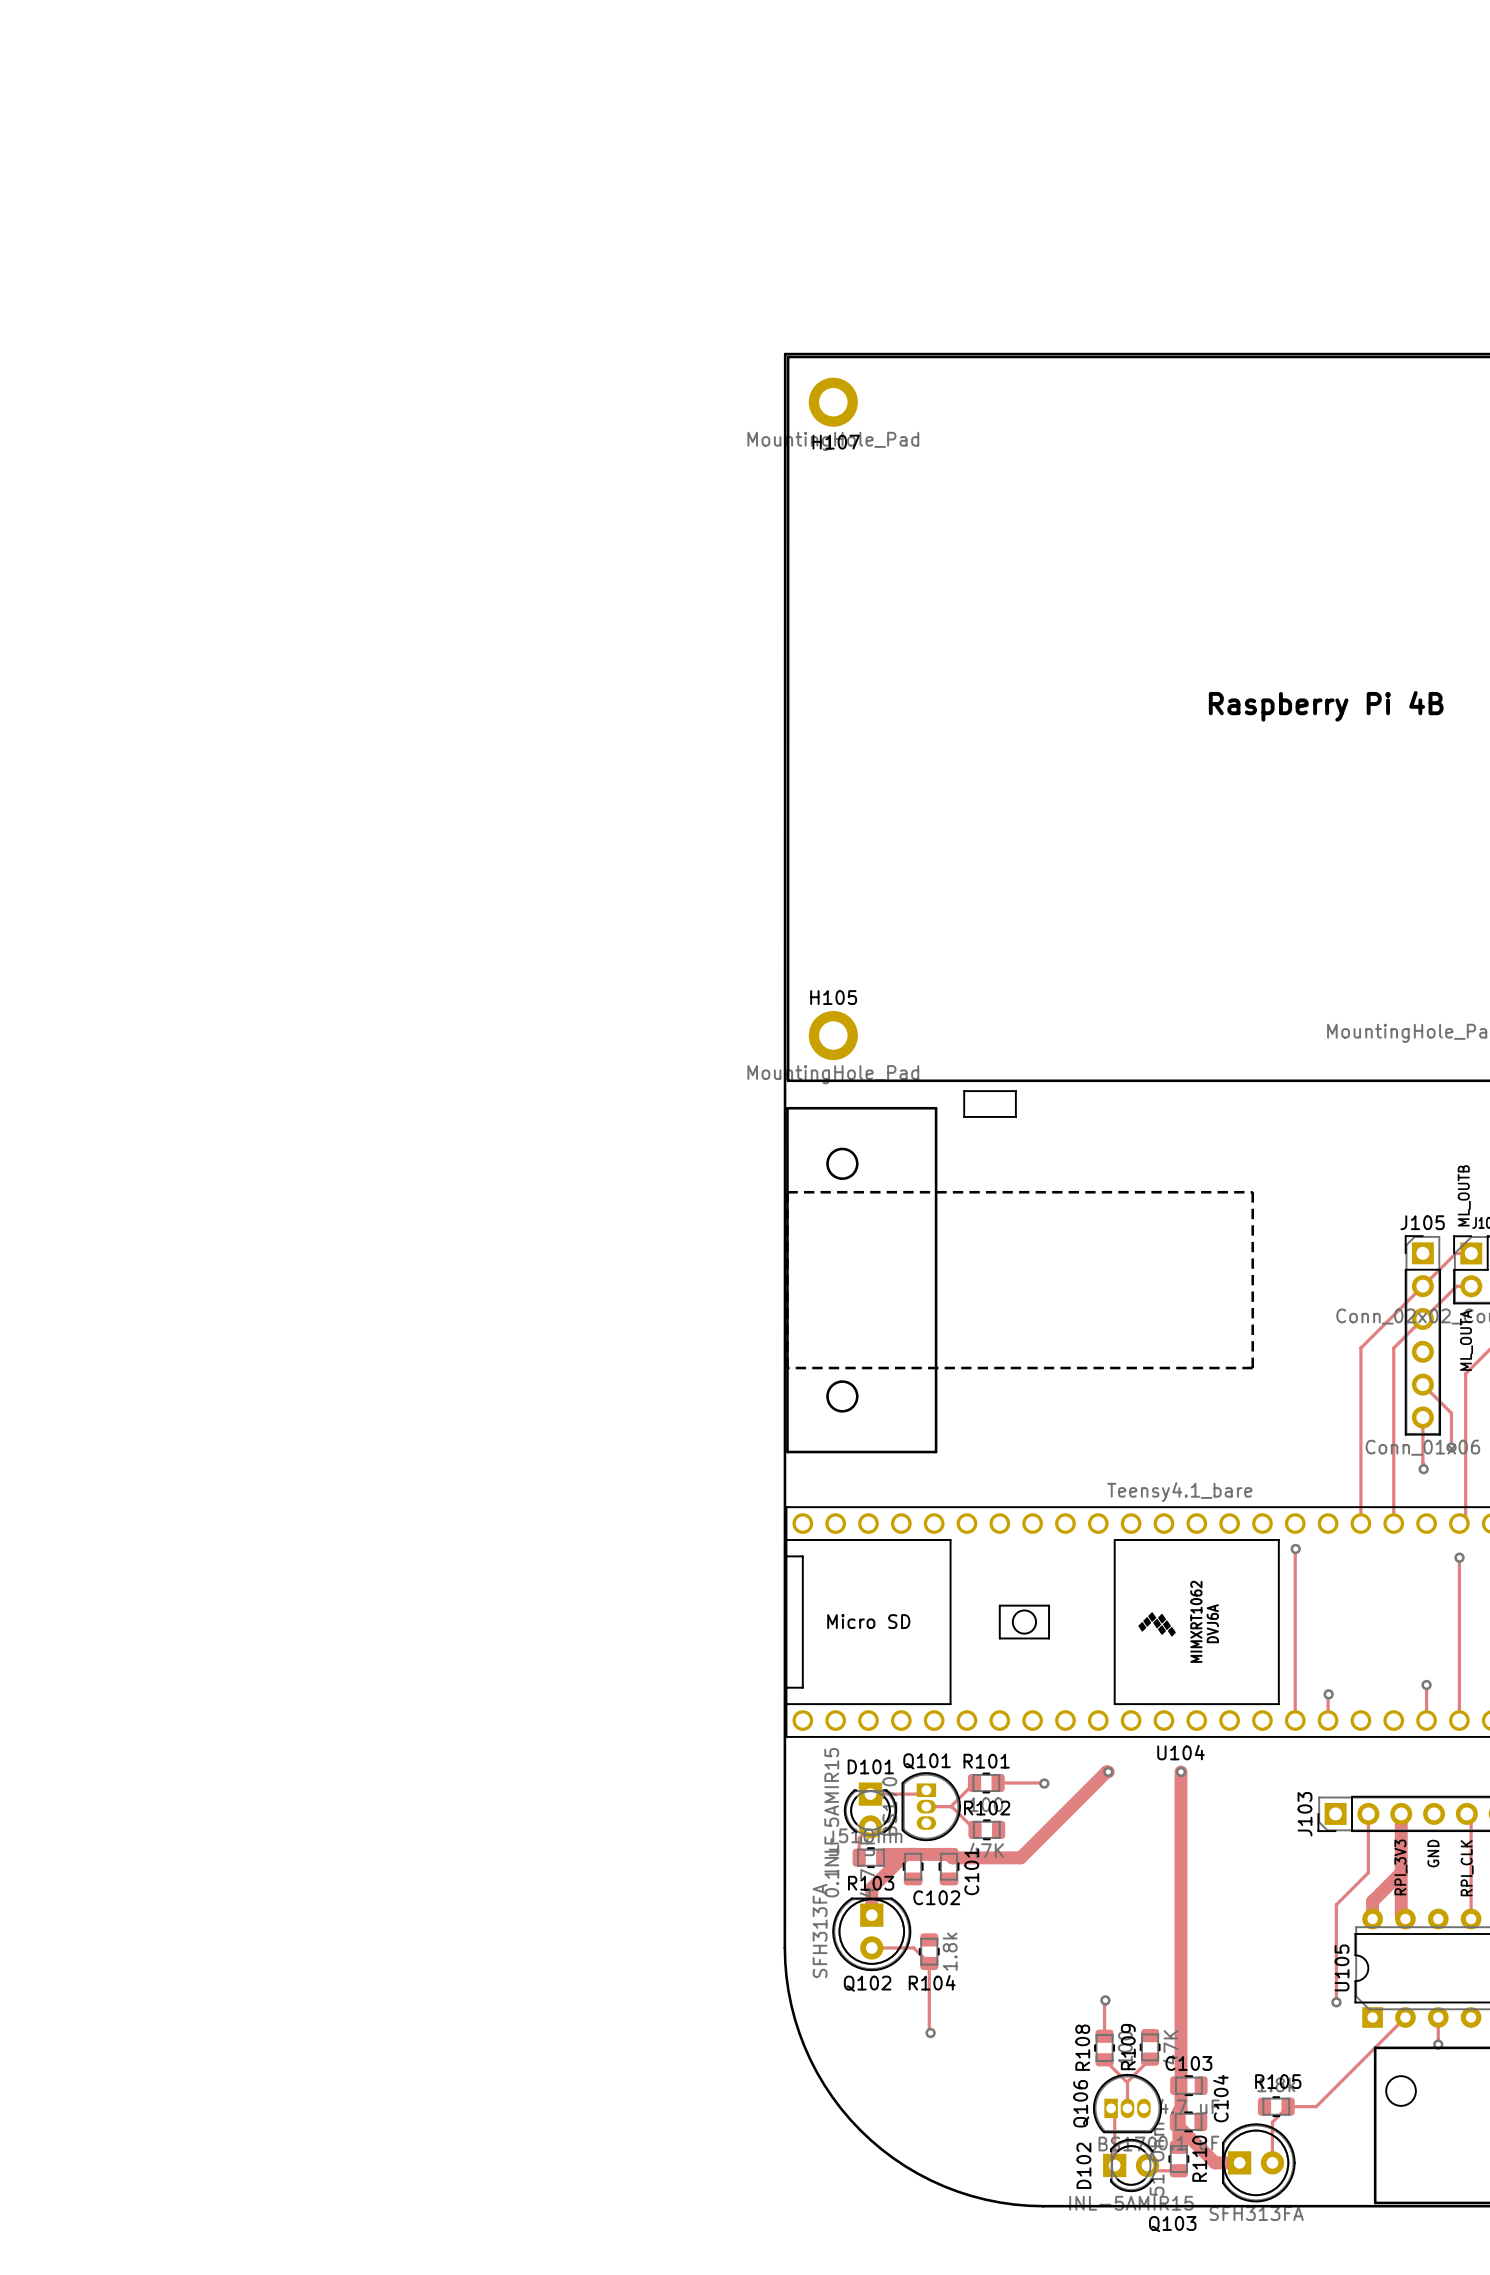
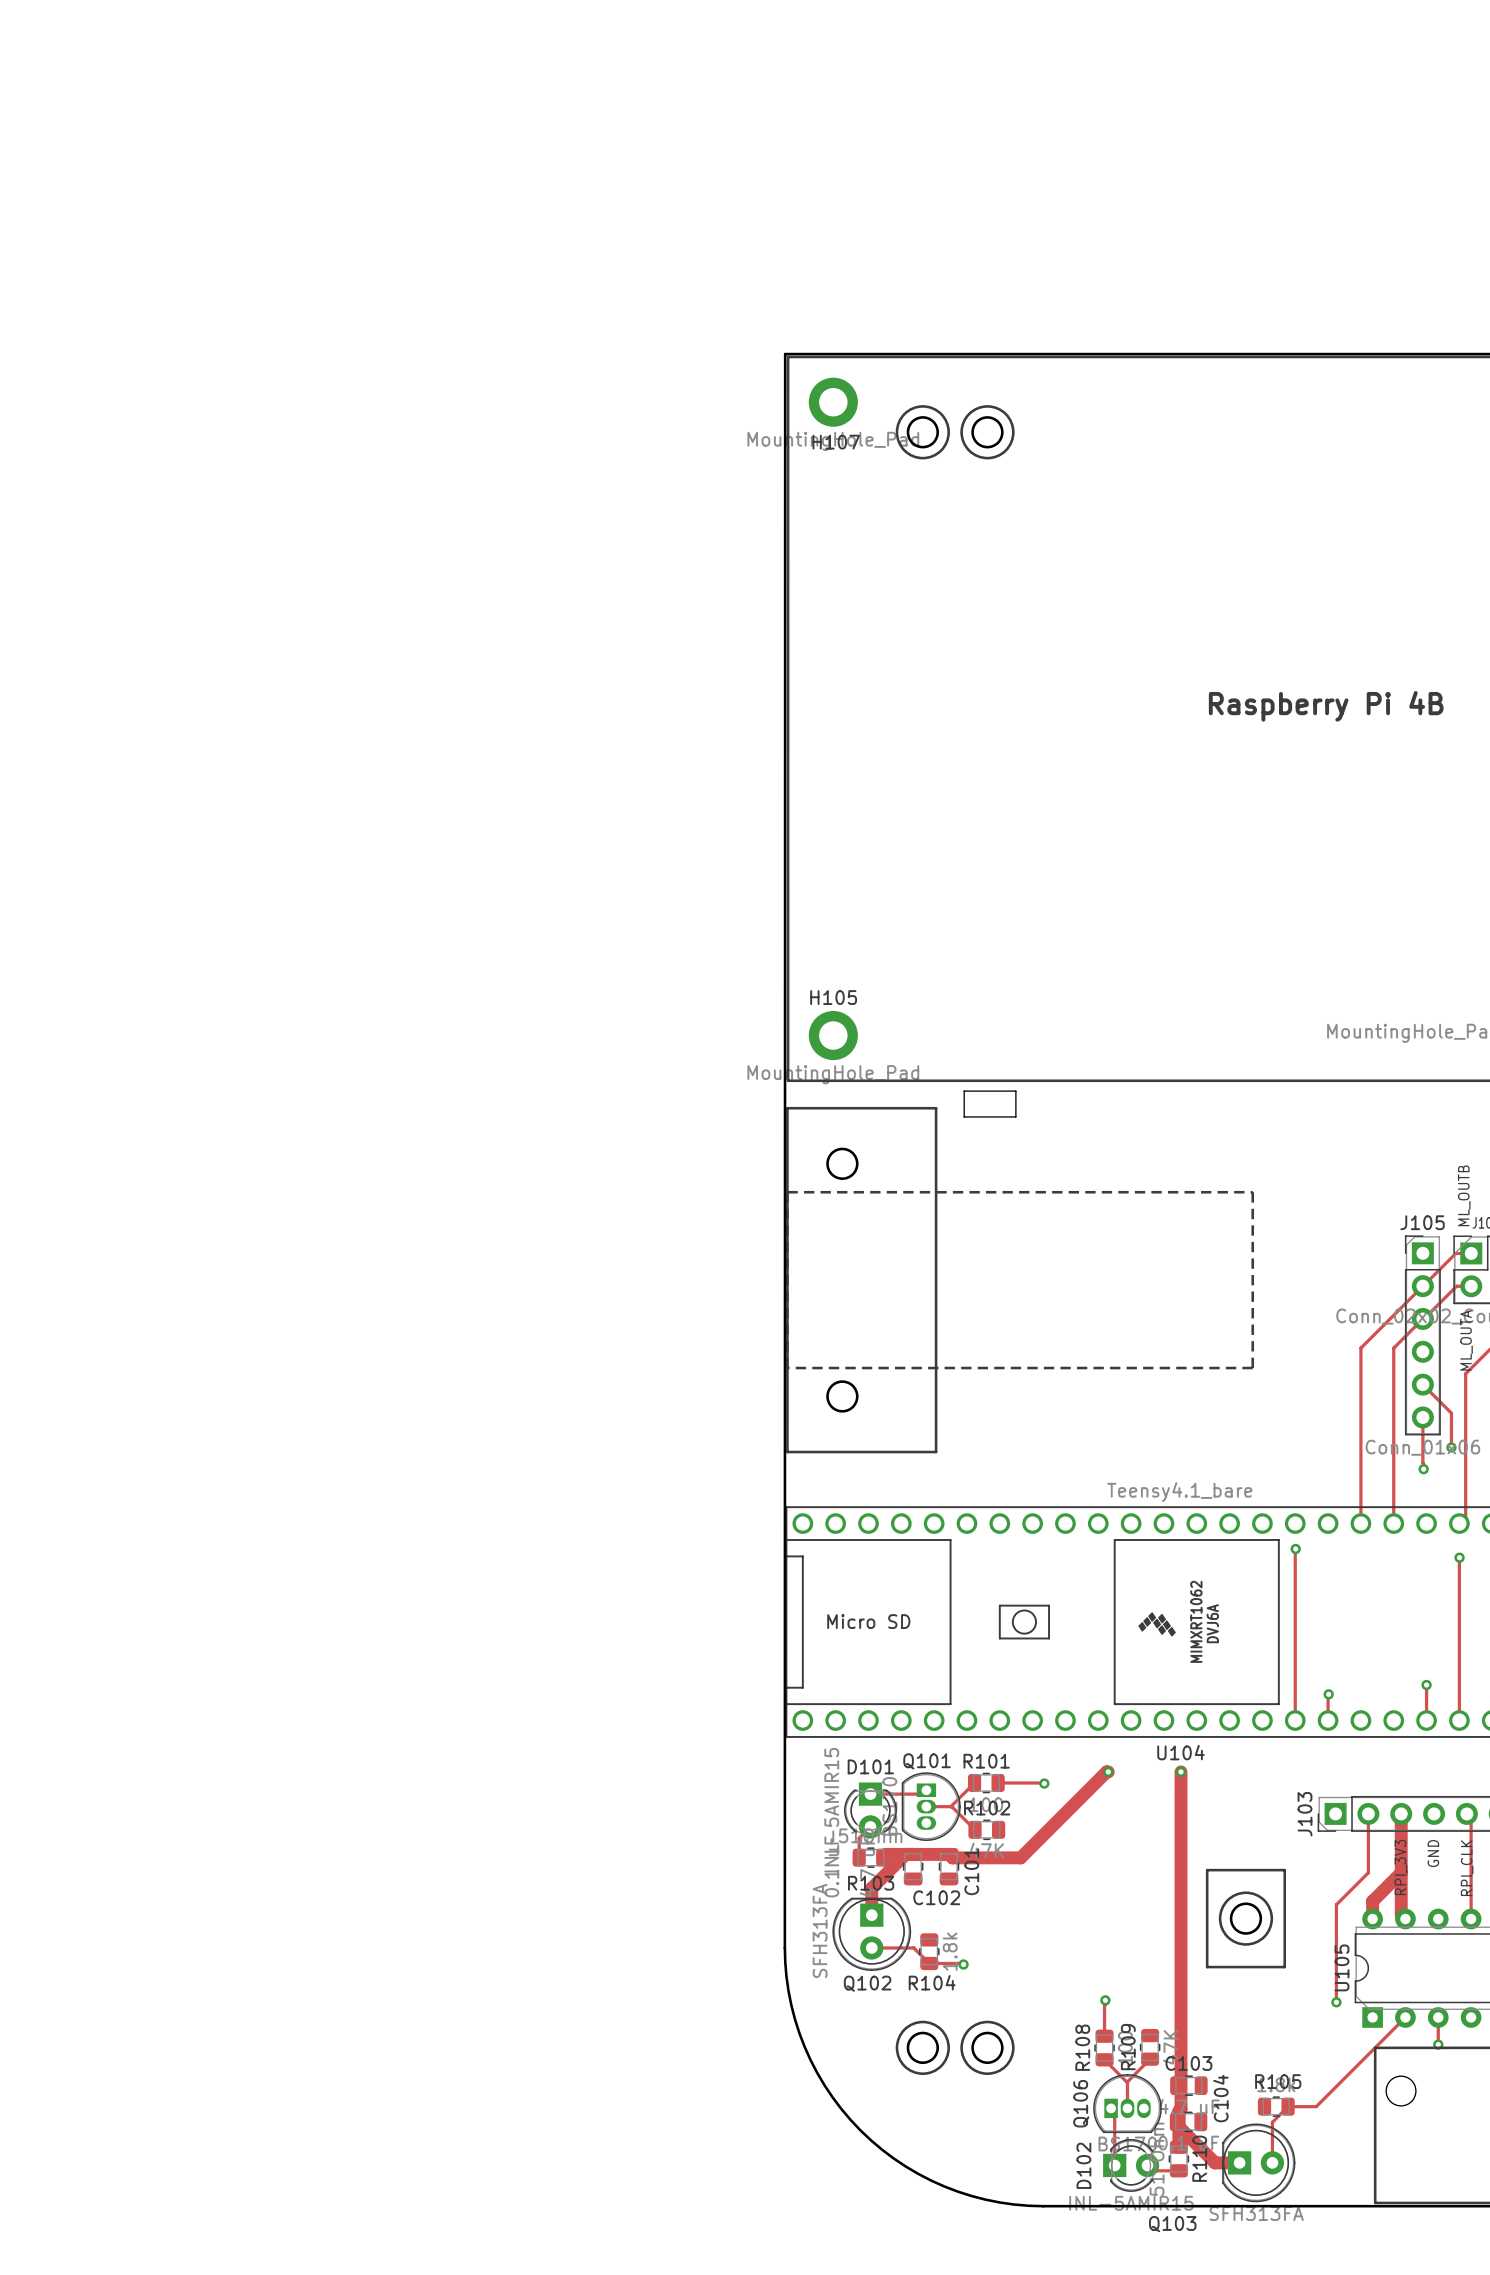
drawing: none -> [895, 405, 1015, 460]
round board edge: none -> [906, 416, 939, 449]
round board edge: none -> [971, 416, 1004, 449]
line: none -> (1207, 1870) (1284, 1870) (1284, 1967) (1207, 1967) (1207, 1870)
drawing: none -> [1218, 1891, 1274, 1946]
round board edge: none -> [1229, 1902, 1263, 1935]
track: (929, 1963) (930, 2032) -> (929, 1963) (963, 1964)
drawing: none -> [895, 2020, 1015, 2076]
round board edge: none -> [906, 2031, 939, 2065]
round board edge: none -> [971, 2031, 1004, 2065]
via position: (930, 2032) -> (963, 1964)

